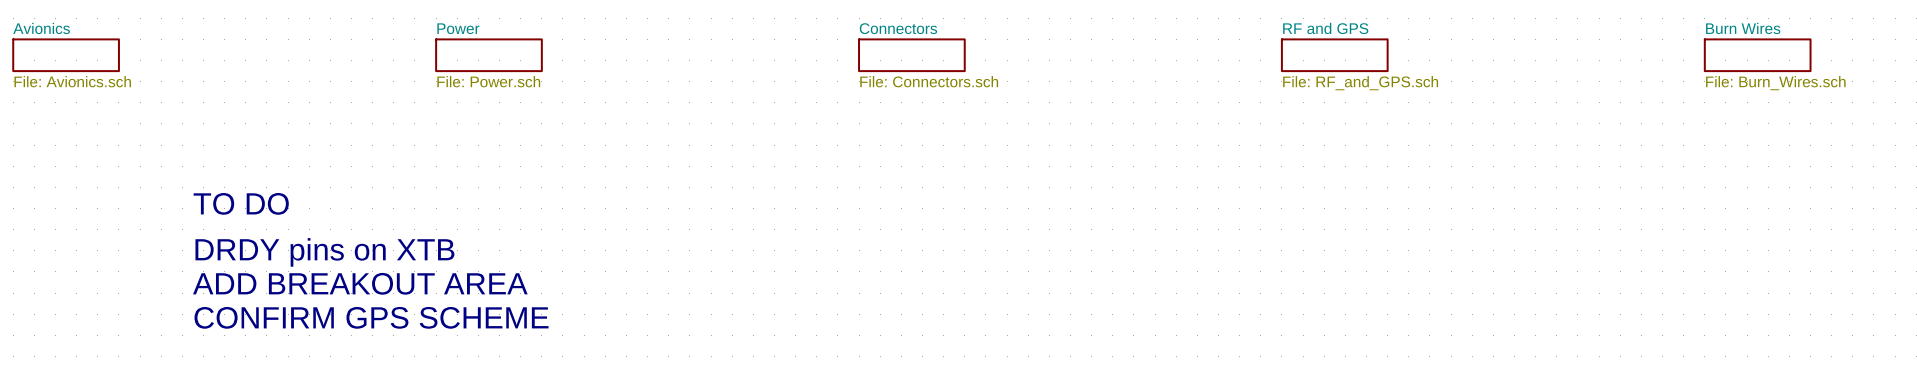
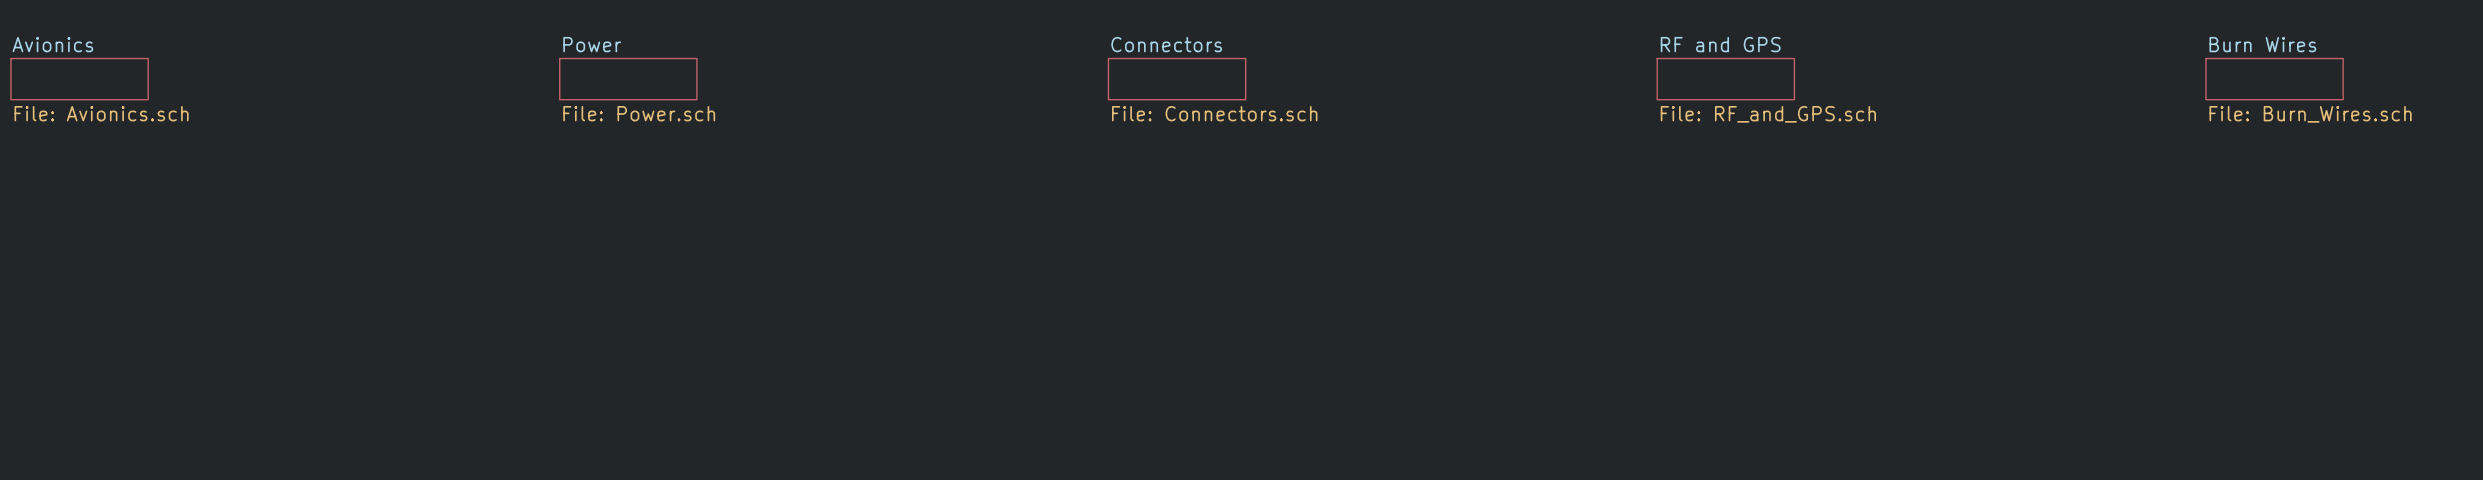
text: TO DO (241, 203) -> none
text: DRDY pins on XTB (324, 252) -> none
text: ADD BREAKOUT AREA (360, 283) -> none
text: CONFIRM GPS SCHEME (371, 317) -> none

